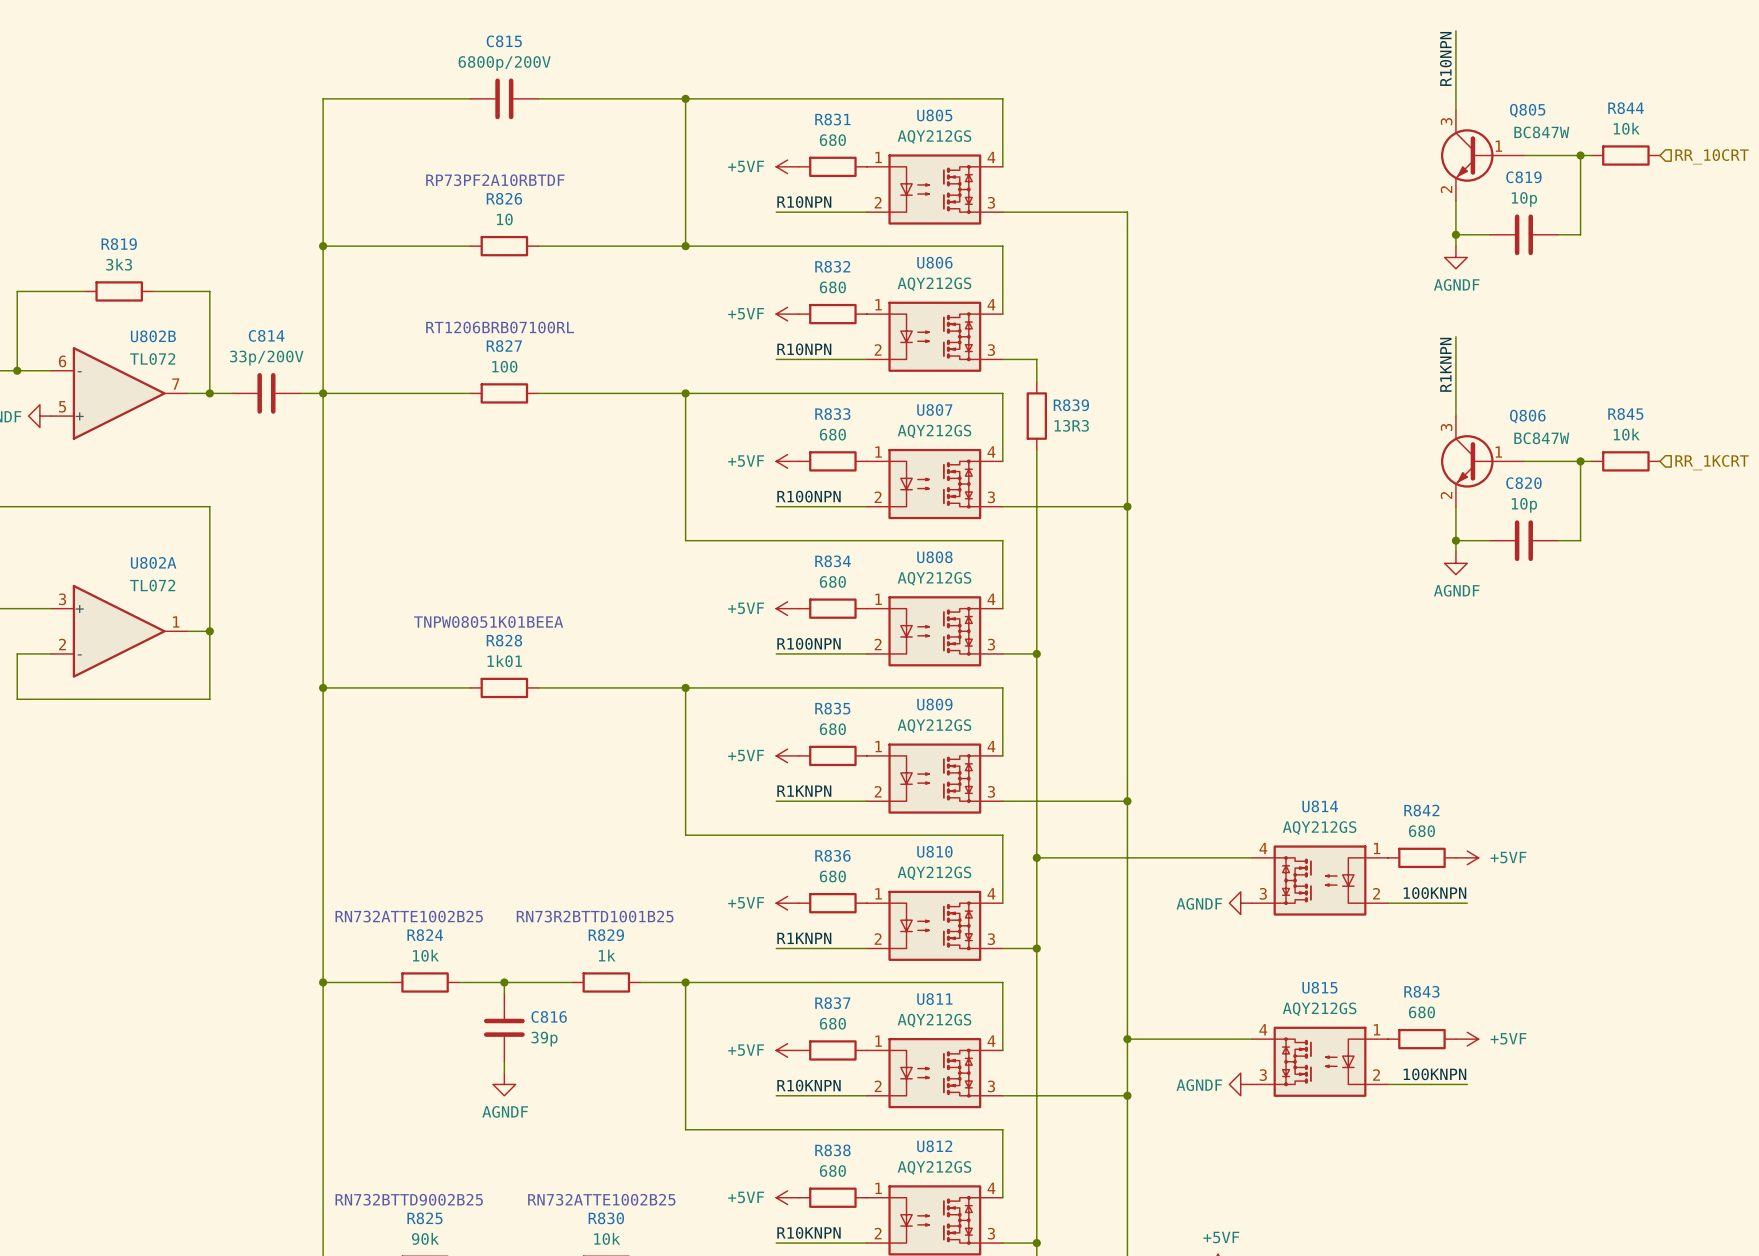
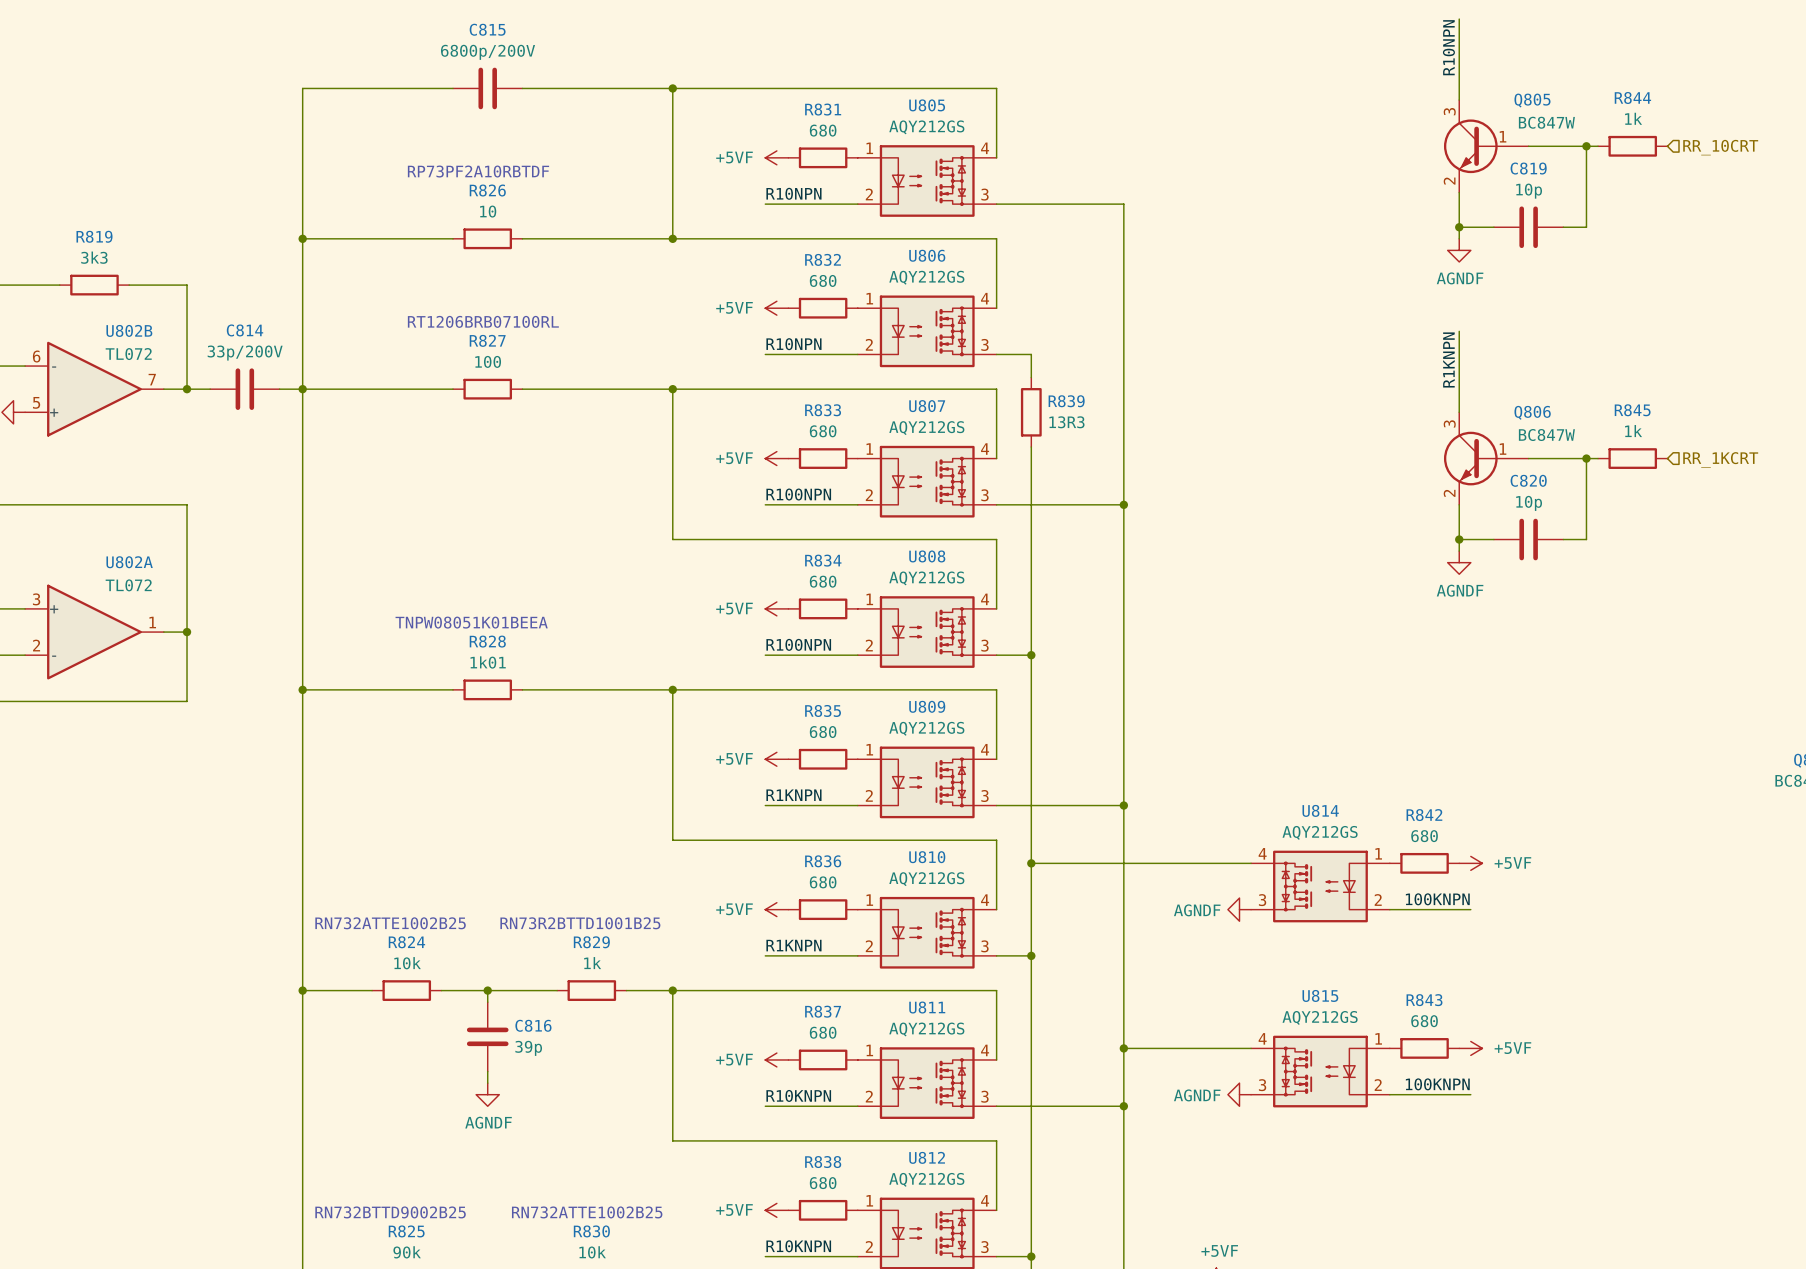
R844 value: 10k (1626, 128) -> 1k (1633, 118)
R845 value: 10k (1626, 434) -> 1k (1633, 431)

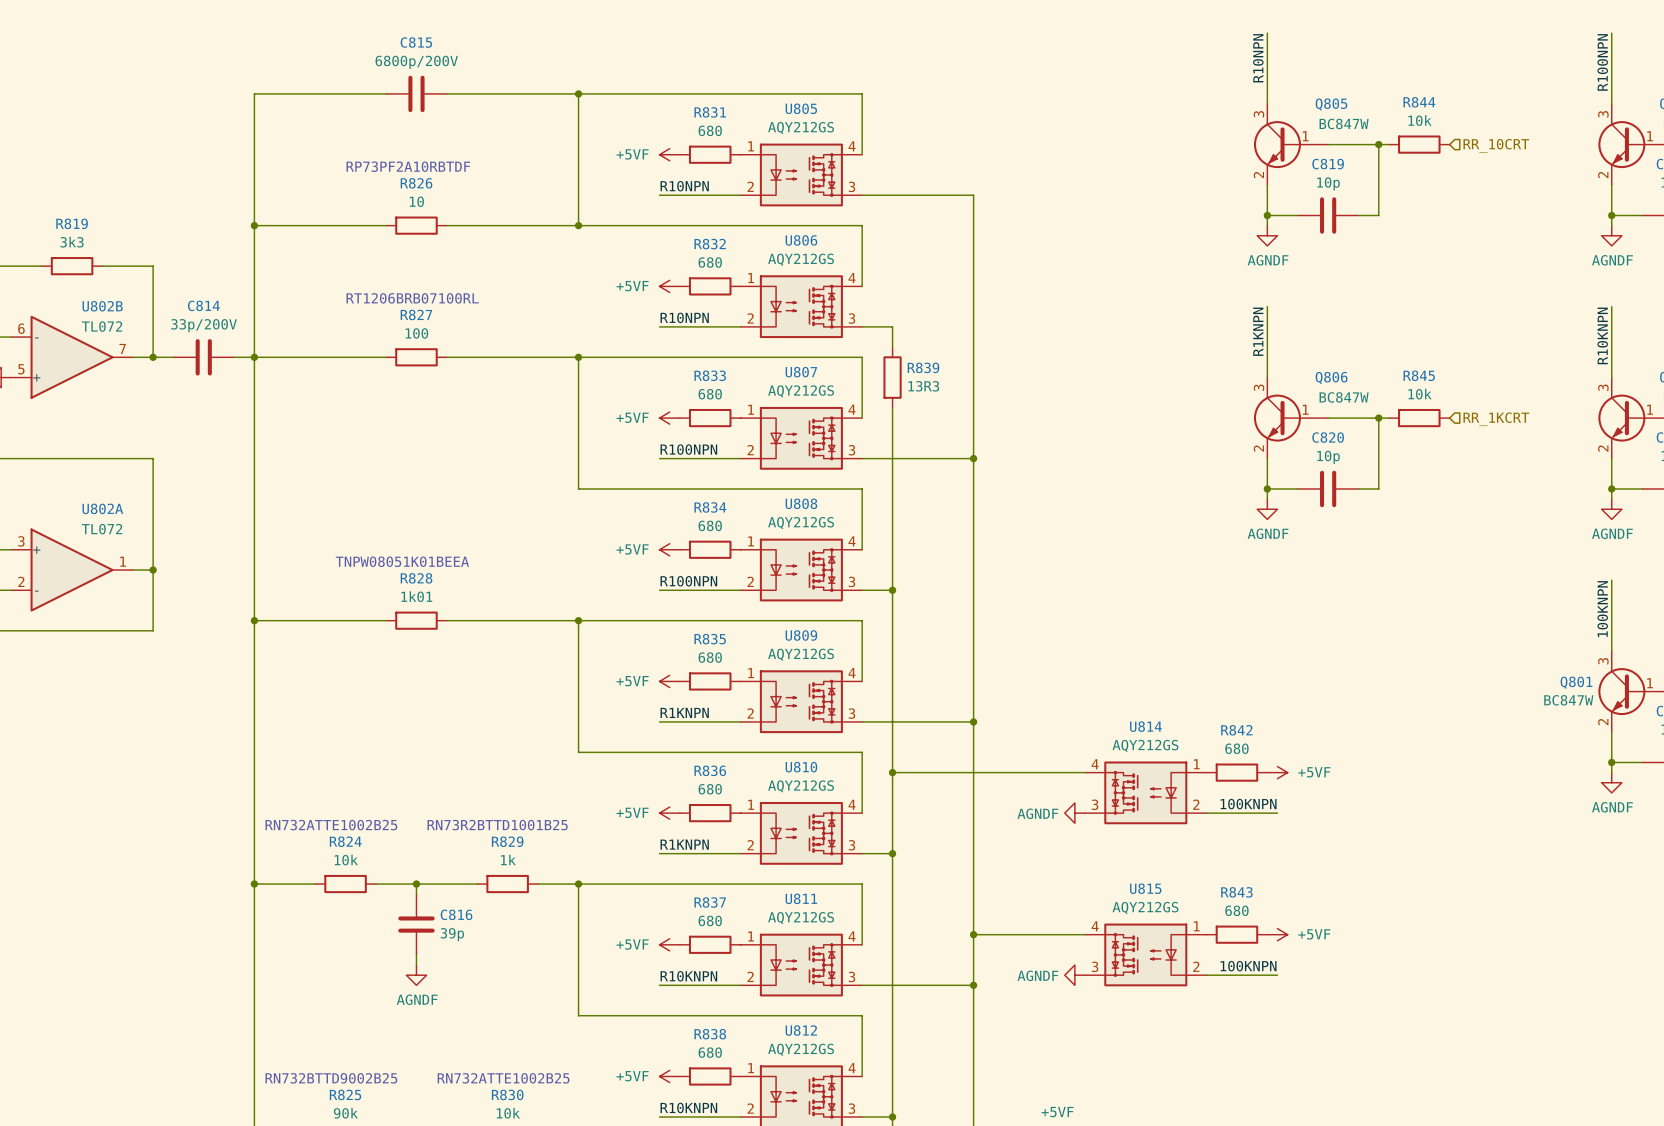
R844 value: 1k (1633, 118) -> 10k (1420, 120)
R845 value: 1k (1633, 431) -> 10k (1420, 394)

